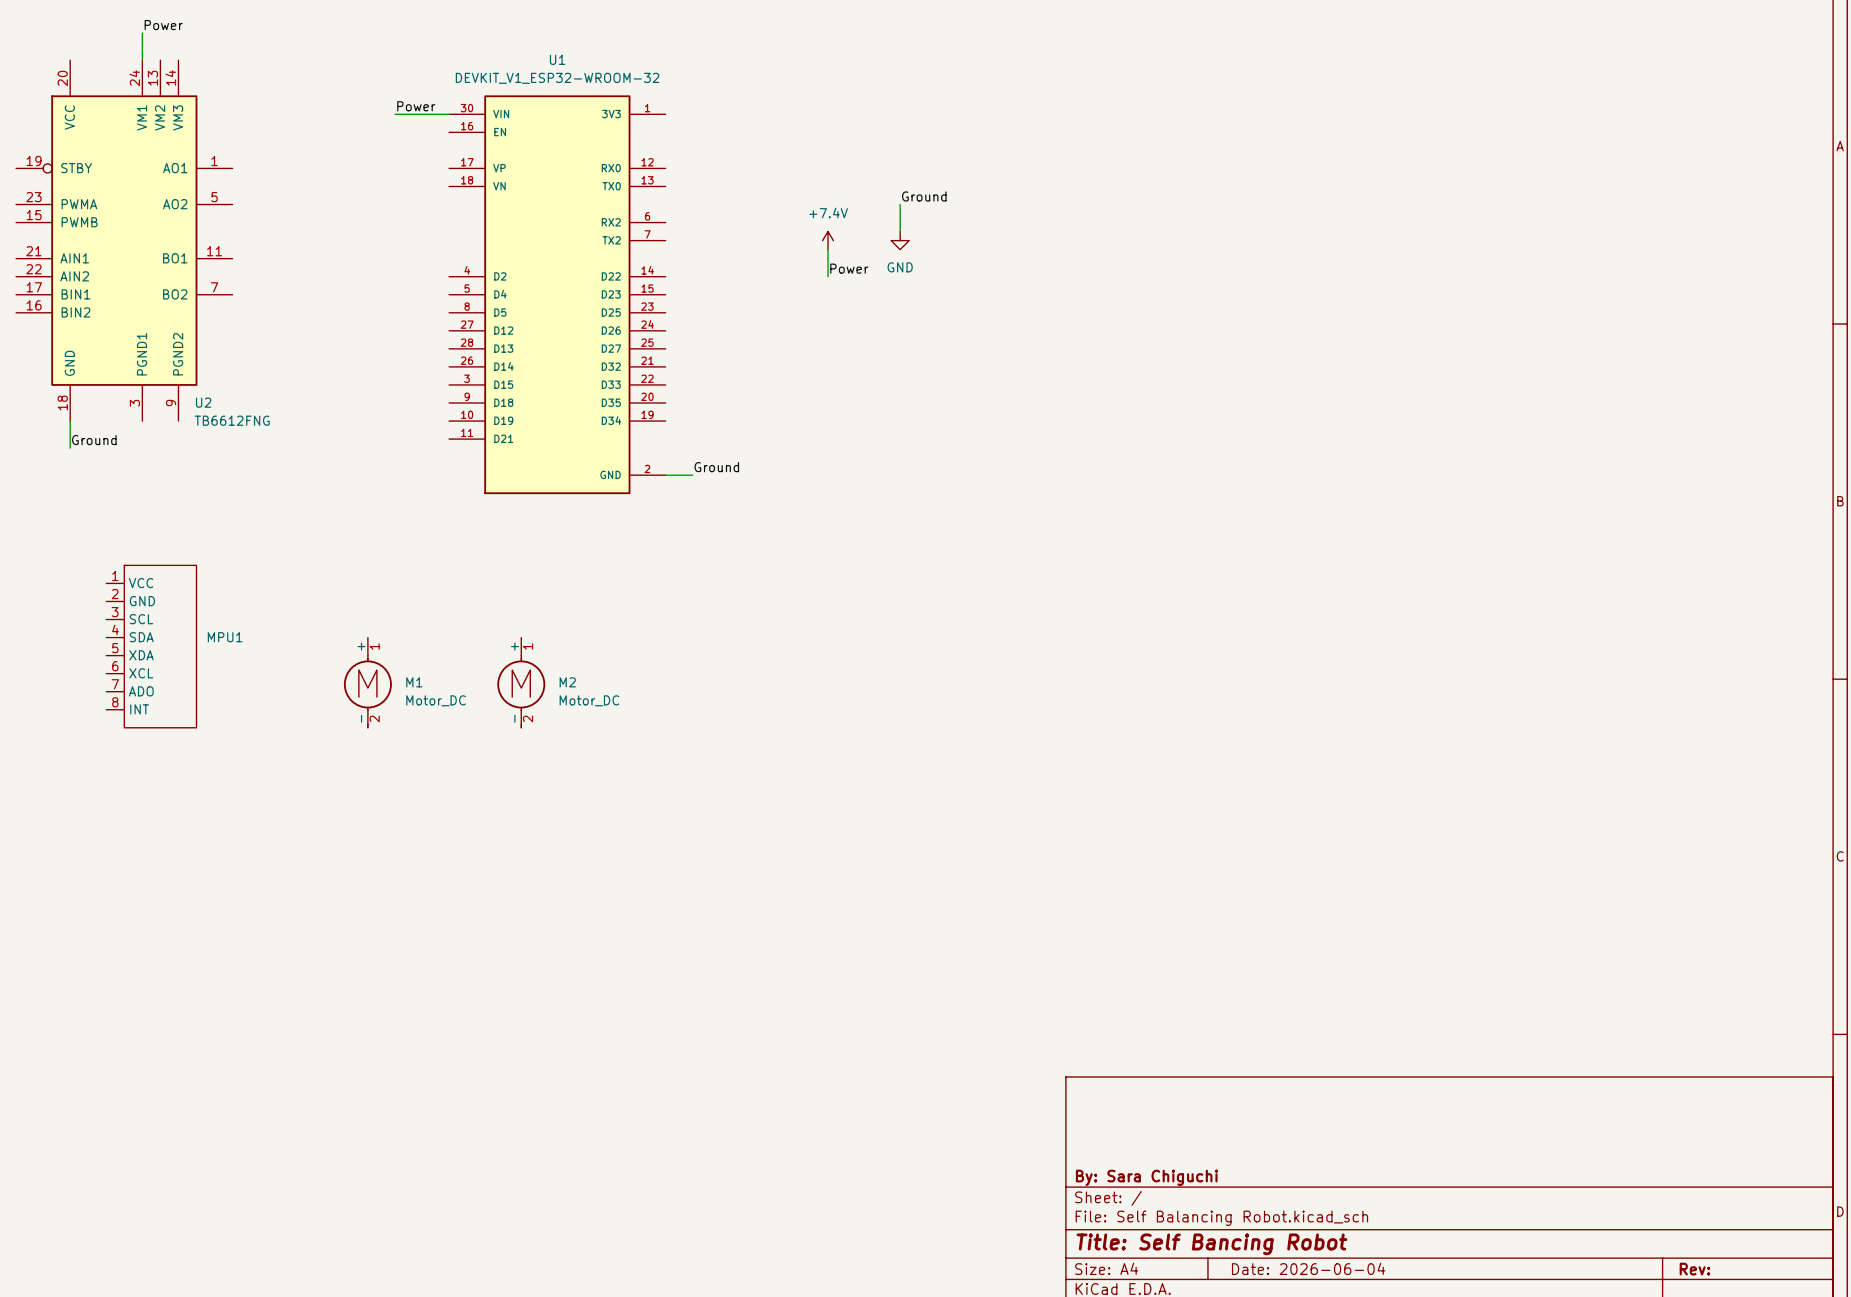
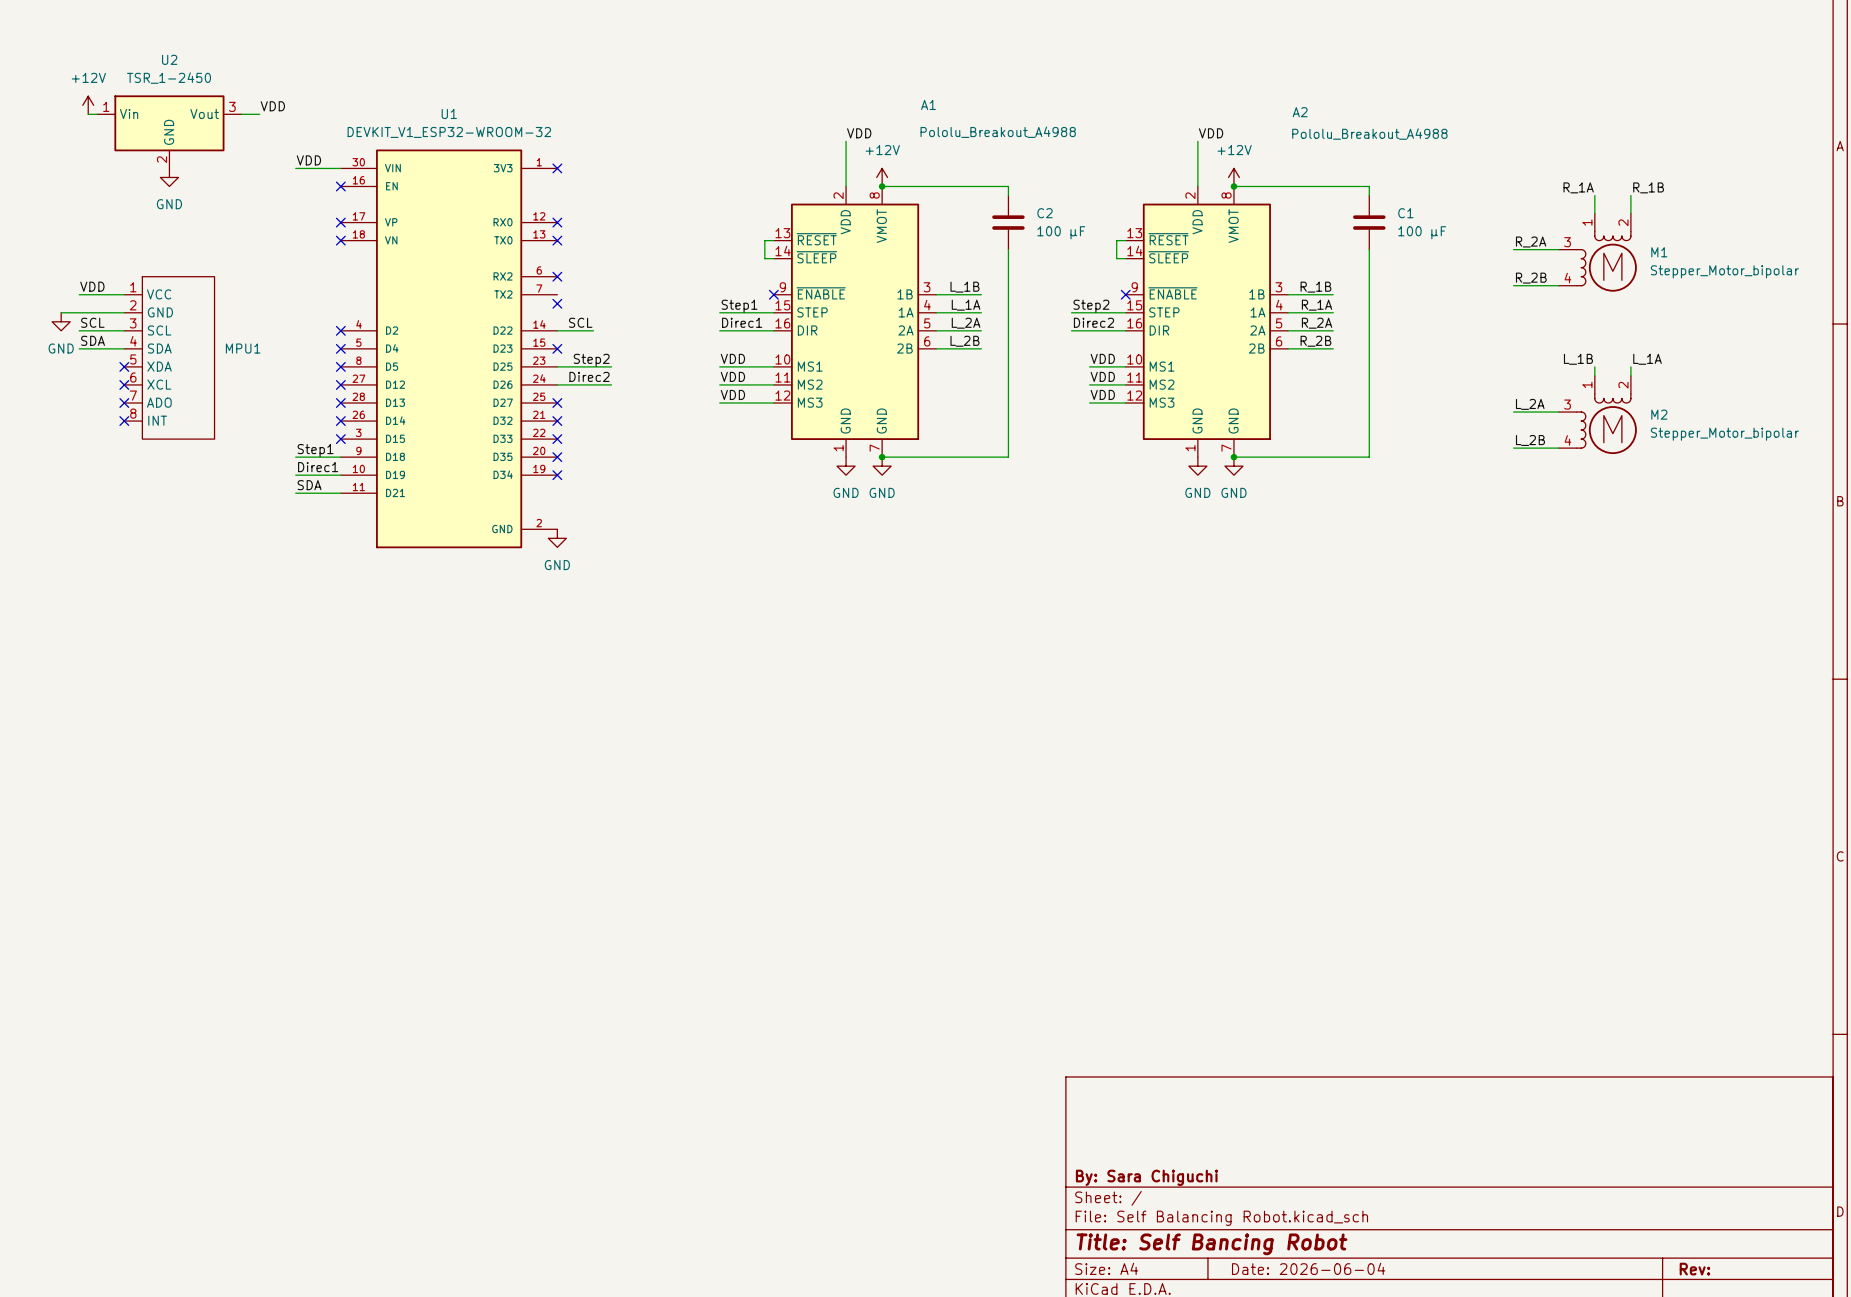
label: Power (163, 25) -> none
wire: (142, 33) (142, 60) -> none
U2 symbol: [16, 60, 233, 422] -> [97, 95, 242, 169]
power symbol: none -> +12V (88, 105)
label: none -> VDD (272, 106)
label: Power (416, 106) -> none
wire: none -> (241, 114) (259, 114)
wire: (394, 114) (449, 114) -> none
label: none -> VDD (859, 133)
label: none -> VDD (1211, 133)
wire: none -> (846, 141) (846, 186)
wire: none -> (1197, 141) (1197, 186)
label: none -> VDD (308, 160)
wire: none -> (295, 168) (340, 168)
no-connect mark: none -> (557, 168)
power symbol: none -> GND (169, 177)
power symbol: none -> +12V (882, 177)
power symbol: none -> +12V (1233, 177)
no-connect mark: none -> (340, 186)
wire: none -> (882, 186) (1008, 186) (1008, 195)
junction: none -> (882, 186)
wire: none -> (1233, 186) (1369, 186) (1369, 195)
junction: none -> (1233, 186)
label: none -> R_1A (1578, 187)
label: none -> R_1B (1648, 187)
wire: none -> (1594, 195) (1594, 213)
wire: none -> (1630, 195) (1630, 213)
label: Ground (924, 196) -> none
no-connect mark: none -> (340, 222)
no-connect mark: none -> (557, 222)
C2: none -> 100 μF (1008, 222)
C1: none -> 100 μF (1369, 222)
no-connect mark: none -> (340, 240)
no-connect mark: none -> (557, 240)
wire: none -> (773, 240) (764, 240) (764, 258) (773, 258)
power symbol: +7.4V (828, 240) -> none
power symbol: GND (900, 240) -> none
wire: none -> (1125, 240) (1116, 240) (1116, 258) (1125, 258)
label: none -> R_2A (1531, 242)
wire: none -> (1008, 249) (1008, 457) (882, 457)
wire: none -> (1369, 249) (1369, 457) (1233, 457)
wire: none -> (1513, 249) (1558, 249)
label: Power (849, 268) -> none
no-connect mark: none -> (557, 276)
label: none -> R_2B (1531, 278)
wire: none -> (1513, 285) (1558, 285)
label: none -> VDD (92, 286)
label: none -> L_1B (964, 287)
label: none -> R_1B (1315, 287)
U1 position: (557, 294) -> (449, 348)
no-connect mark: none -> (773, 294)
wire: none -> (936, 294) (981, 294)
no-connect mark: none -> (1125, 294)
wire: none -> (1288, 294) (1333, 294)
no-connect mark: none -> (557, 303)
label: none -> L_1A (966, 305)
label: none -> R_1A (1317, 305)
label: none -> Step1 (739, 306)
label: none -> Step2 (1091, 306)
wire: none -> (719, 312) (773, 312)
wire: none -> (936, 312) (981, 312)
wire: none -> (1071, 312) (1125, 312)
wire: none -> (1288, 312) (1333, 312)
power symbol: none -> GND (61, 321)
A1: none -> Pololu_Breakout_A4988 (855, 321)
A2: none -> Pololu_Breakout_A4988 (1206, 321)
label: none -> SCL (92, 322)
label: none -> SCL (580, 322)
label: none -> Direc1 (742, 322)
label: none -> Direc2 (1093, 322)
label: none -> L_2A (966, 323)
label: none -> R_2A (1317, 323)
no-connect mark: none -> (340, 330)
wire: none -> (719, 330) (773, 330)
wire: none -> (936, 330) (981, 330)
wire: none -> (1071, 330) (1125, 330)
wire: none -> (1288, 330) (1333, 330)
label: none -> SDA (93, 340)
label: none -> L_2B (964, 341)
label: none -> R_2B (1315, 341)
no-connect mark: none -> (340, 348)
no-connect mark: none -> (557, 348)
wire: none -> (936, 348) (981, 348)
wire: none -> (1288, 348) (1333, 348)
label: none -> VDD (732, 358)
label: none -> VDD (1102, 358)
label: none -> L_1B (1578, 359)
label: none -> L_1A (1647, 359)
label: none -> Step2 (591, 360)
no-connect mark: none -> (124, 366)
no-connect mark: none -> (340, 366)
wire: none -> (719, 366) (773, 366)
wire: none -> (1089, 366) (1125, 366)
wire: none -> (1594, 366) (1594, 375)
wire: none -> (1630, 366) (1630, 375)
label: none -> Direc2 (589, 376)
label: none -> VDD (732, 376)
label: none -> VDD (1102, 376)
no-connect mark: none -> (124, 384)
no-connect mark: none -> (340, 384)
wire: none -> (719, 384) (773, 384)
wire: none -> (1089, 384) (1125, 384)
label: none -> VDD (732, 394)
label: none -> VDD (1102, 394)
U2 name position: U2 (203, 402) -> U2 (169, 59)
no-connect mark: none -> (124, 403)
no-connect mark: none -> (340, 403)
no-connect mark: none -> (557, 403)
wire: none -> (719, 403) (773, 403)
wire: none -> (1089, 403) (1125, 403)
label: none -> L_2A (1530, 404)
wire: none -> (1513, 412) (1558, 412)
U2 value: TB6612FNG (232, 420) -> TSR_1-2450 (169, 78)
wire: (70, 421) (70, 448) -> none
no-connect mark: none -> (124, 421)
no-connect mark: none -> (340, 421)
no-connect mark: none -> (557, 421)
no-connect mark: none -> (340, 439)
no-connect mark: none -> (557, 439)
label: Ground (94, 440) -> none
label: none -> L_2B (1530, 440)
wire: none -> (1513, 448) (1558, 448)
label: none -> Step1 (315, 450)
wire: none -> (295, 457) (340, 457)
no-connect mark: none -> (557, 457)
junction: none -> (882, 457)
junction: none -> (1233, 457)
power symbol: none -> GND (846, 466)
power symbol: none -> GND (882, 466)
power symbol: none -> GND (1197, 466)
power symbol: none -> GND (1233, 466)
label: none -> Direc1 (318, 467)
label: Ground (716, 467) -> none
wire: none -> (295, 475) (340, 475)
no-connect mark: none -> (557, 475)
wire: (665, 475) (692, 475) -> none
label: none -> SDA (309, 485)
wire: none -> (295, 493) (340, 493)
power symbol: none -> GND (557, 538)
M1 symbol: [343, 637, 392, 728] -> [1558, 213, 1637, 292]
M2 symbol: [497, 637, 546, 728] -> [1558, 375, 1637, 455]
MPU1 position: (151, 646) -> (169, 357)
M1 name position: M1 (414, 682) -> M1 (1659, 252)
M2 name position: M2 (567, 682) -> M2 (1659, 414)
M1 value: Motor_DC (436, 700) -> Stepper_Motor_bipolar (1724, 271)
M2 value: Motor_DC (589, 700) -> Stepper_Motor_bipolar (1724, 434)

